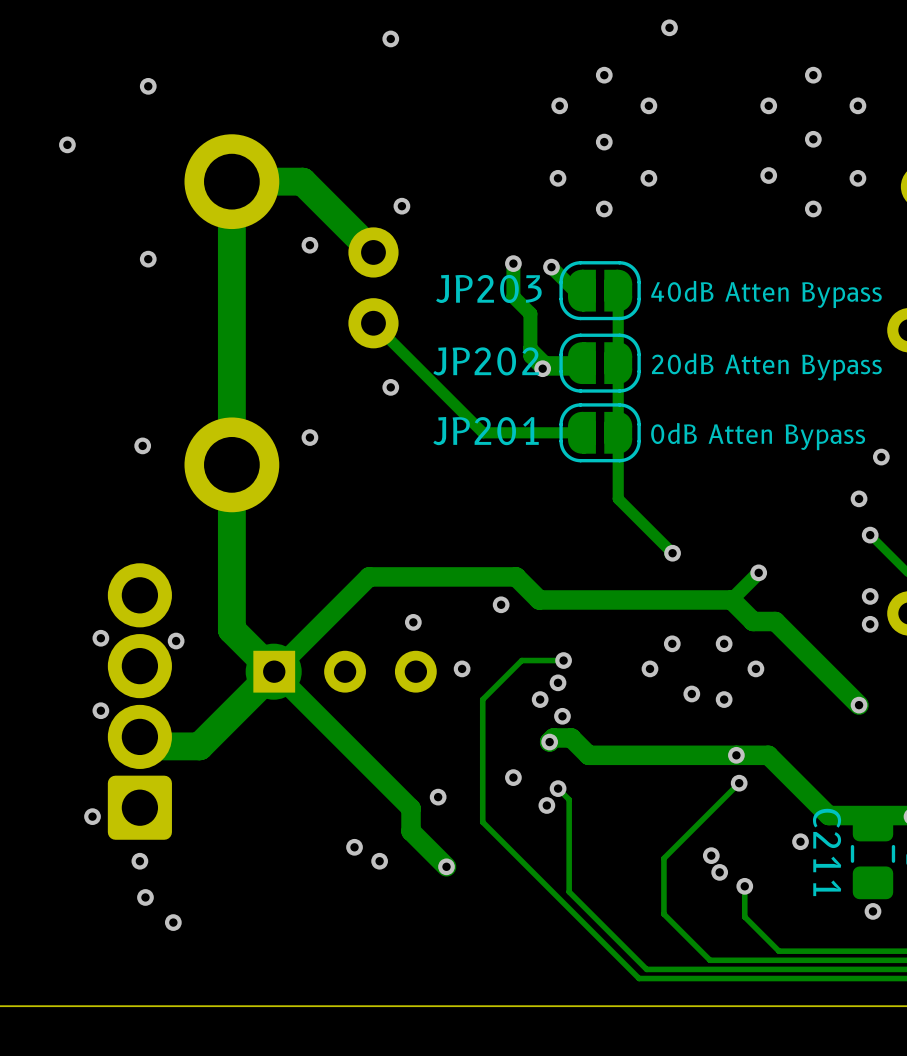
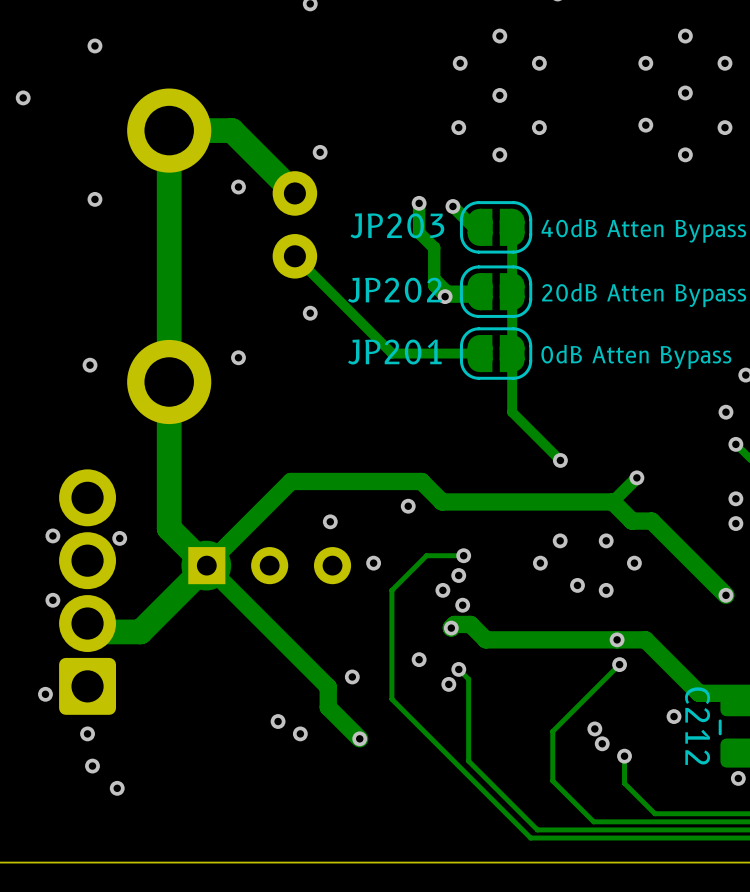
C211 name: C211 (827, 852) -> C212 (697, 726)

